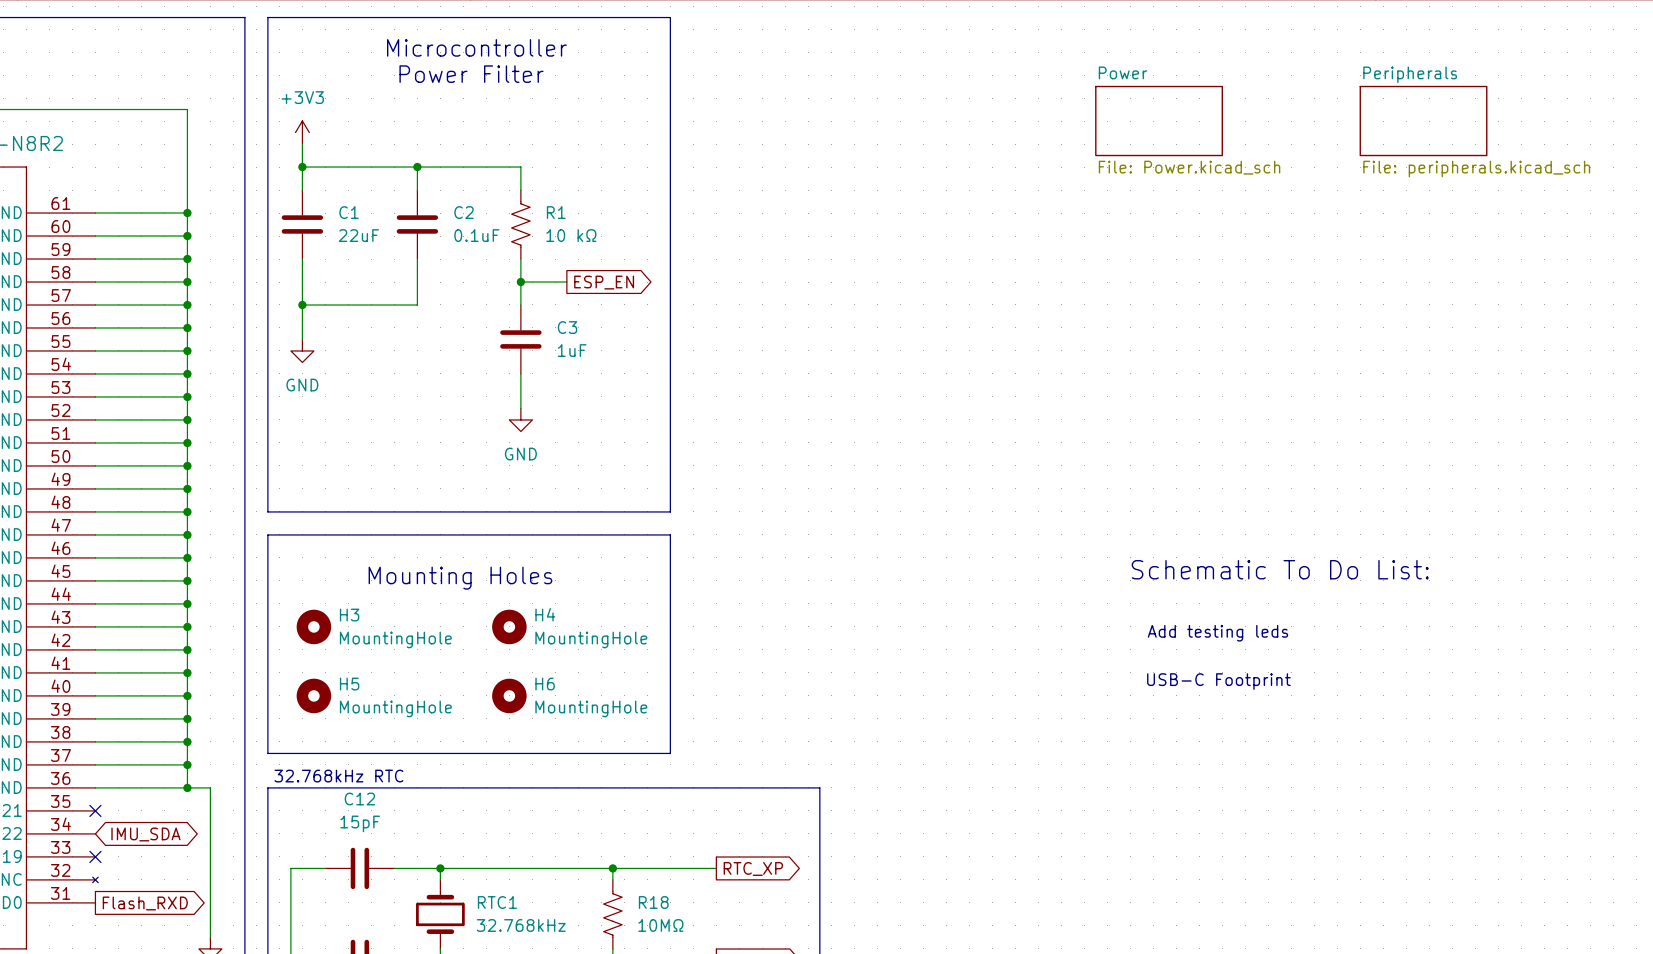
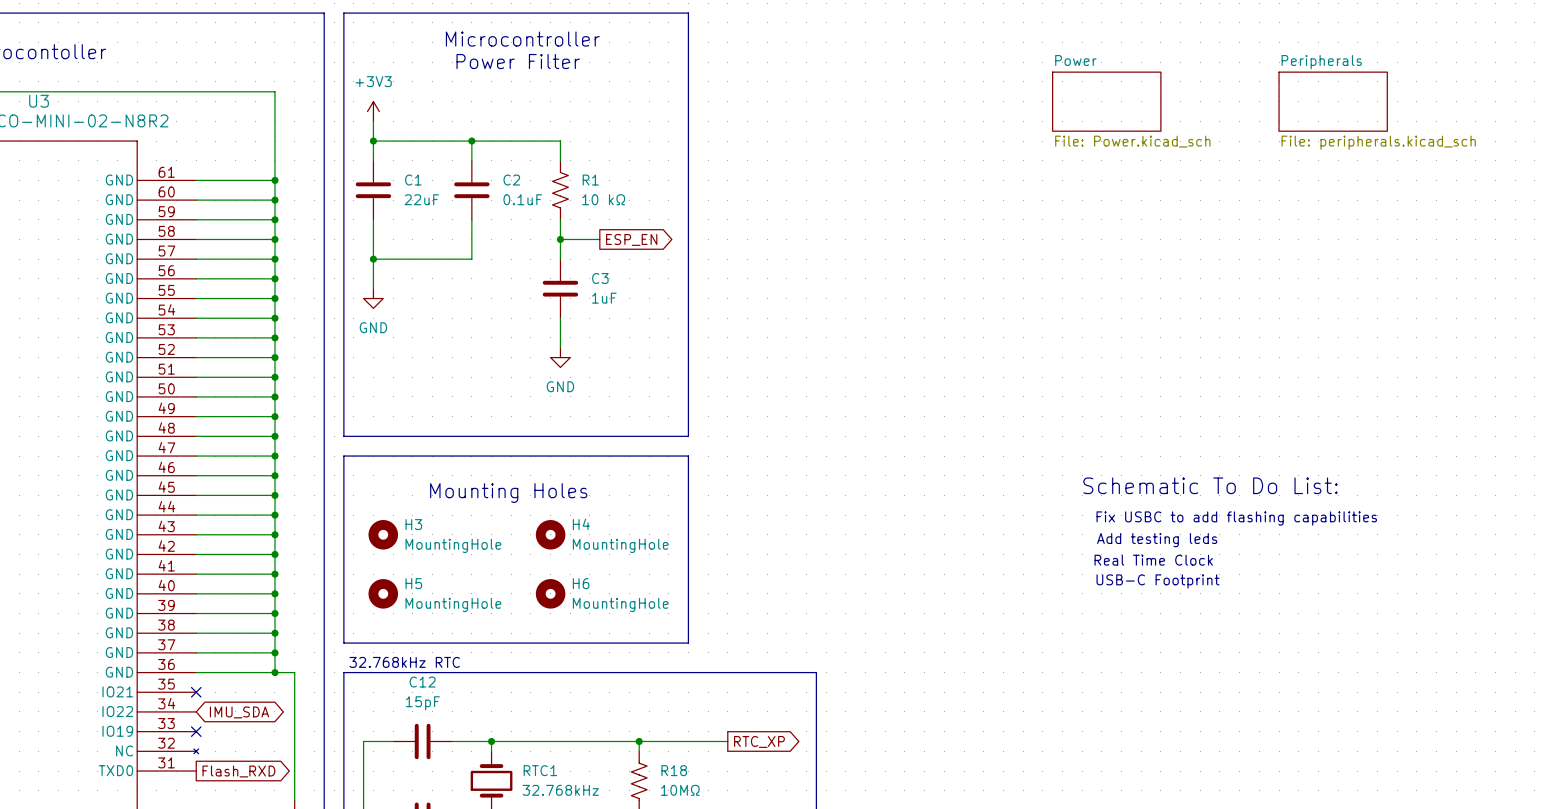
text: none -> Fix USBC to add flashing capabilities (1236, 518)
text: none -> Real Time Clock (1153, 560)

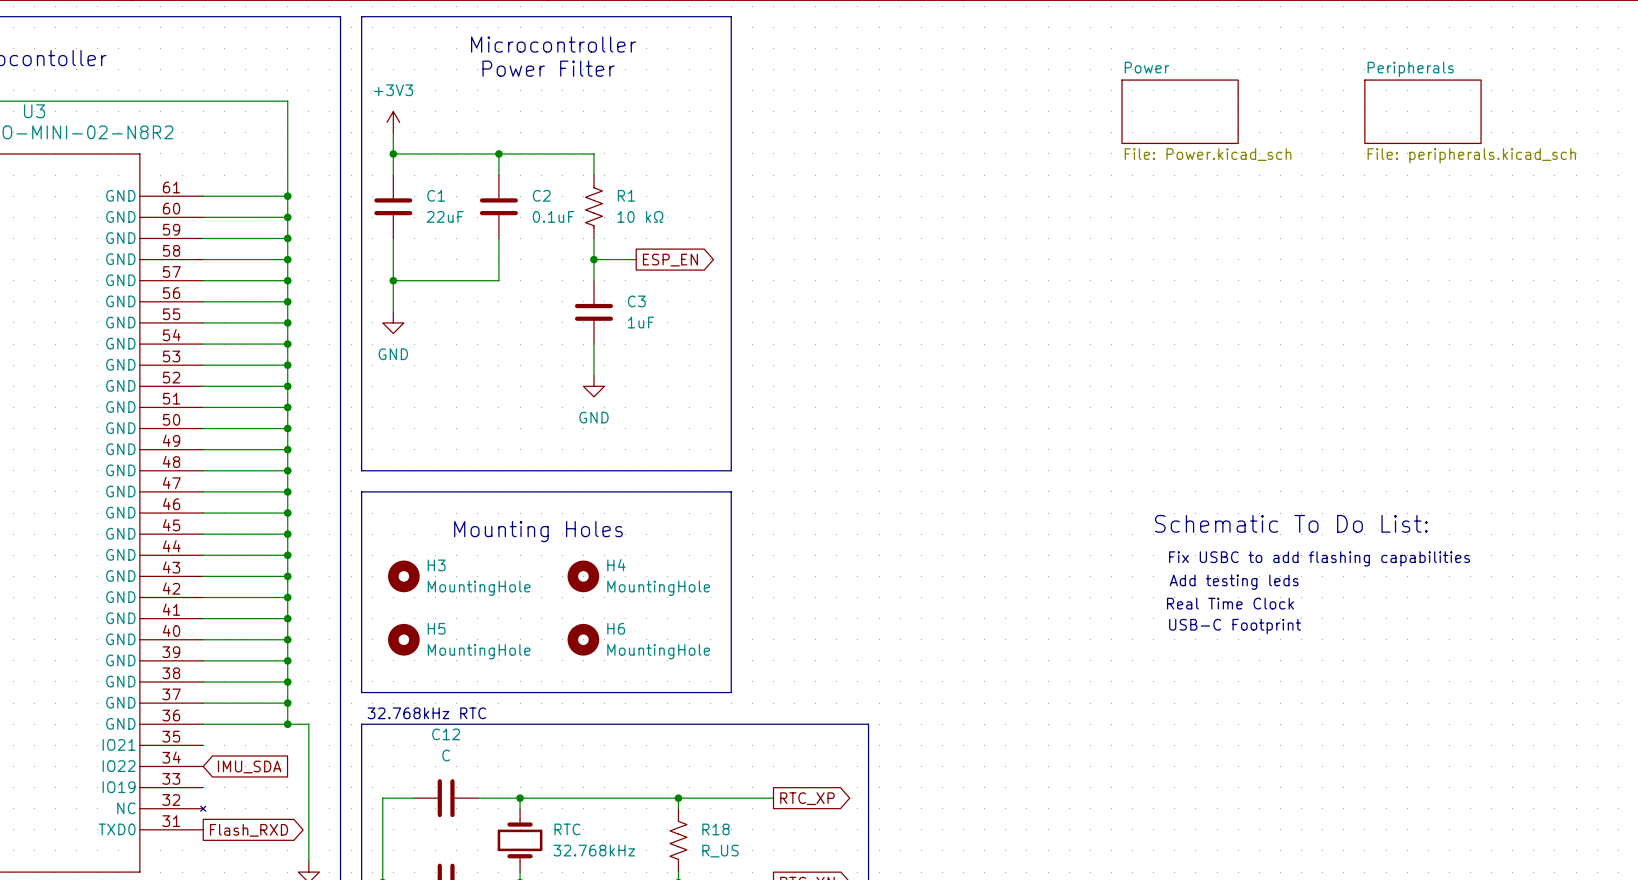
no-connect mark: (196, 692) -> none
C12 value: 15pF (422, 703) -> C (446, 755)
global label shape: bidirectional (239, 712) -> input (249, 766)
no-connect mark: (196, 731) -> none
RTC1 name: RTC1 (540, 770) -> RTC (567, 829)
R18 value: 10MΩ (680, 790) -> R_US (720, 851)

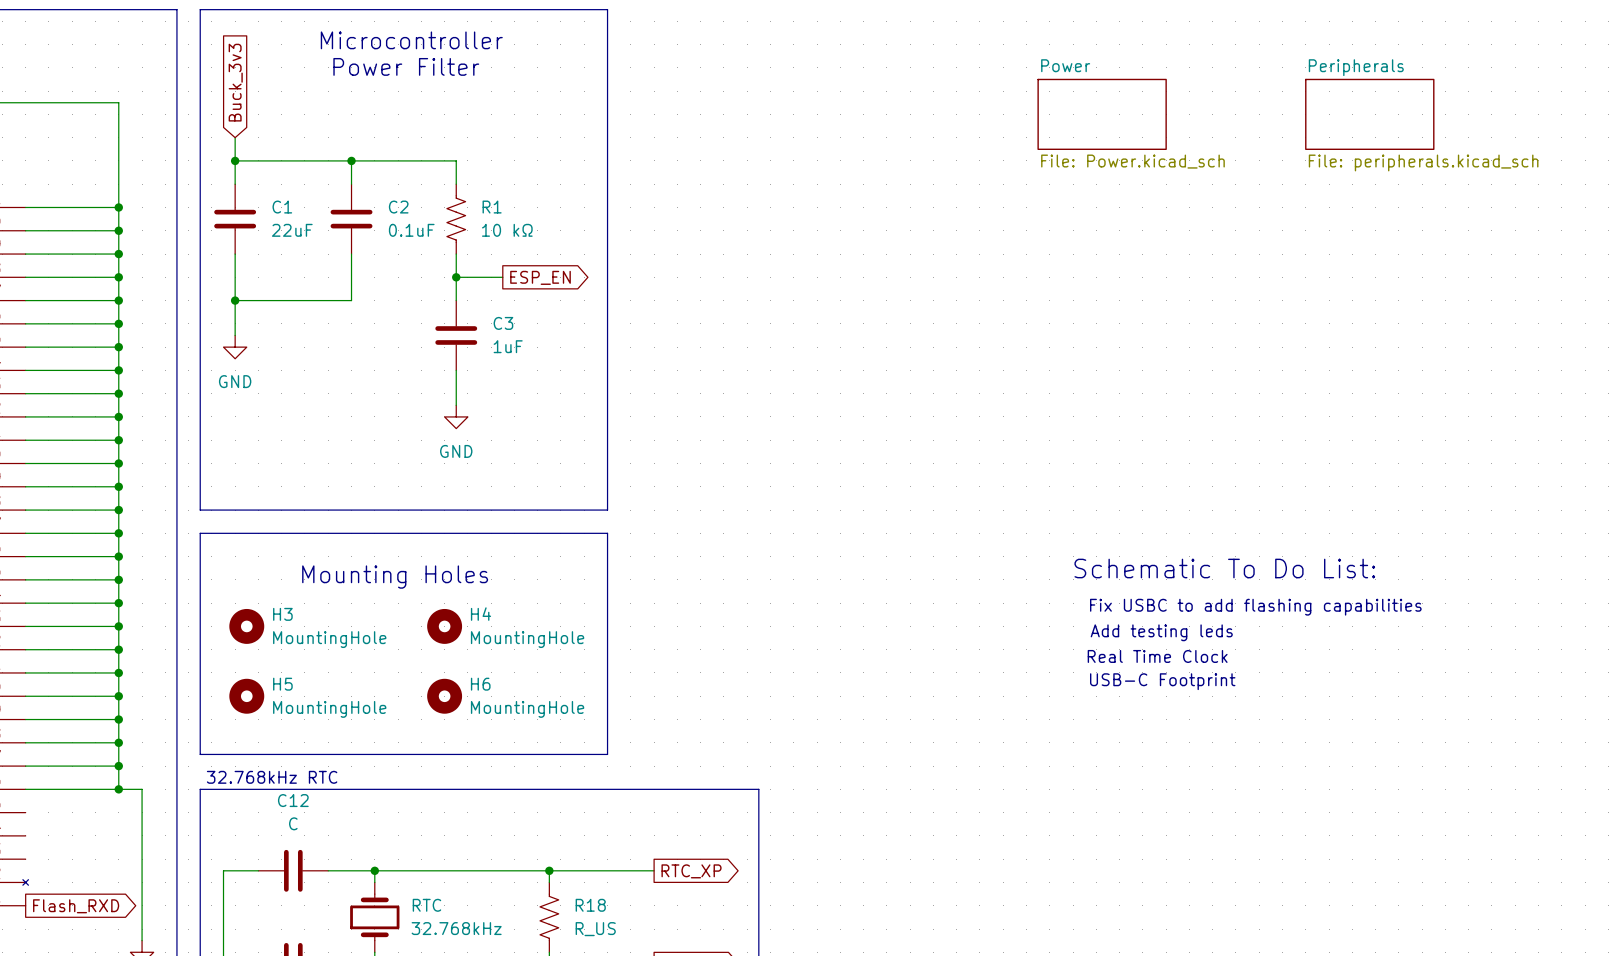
global label: none -> Buck_3v3 (235, 82)
power symbol: +3V3 (393, 122) -> none
global label: IMU_SDA (249, 766) -> none

